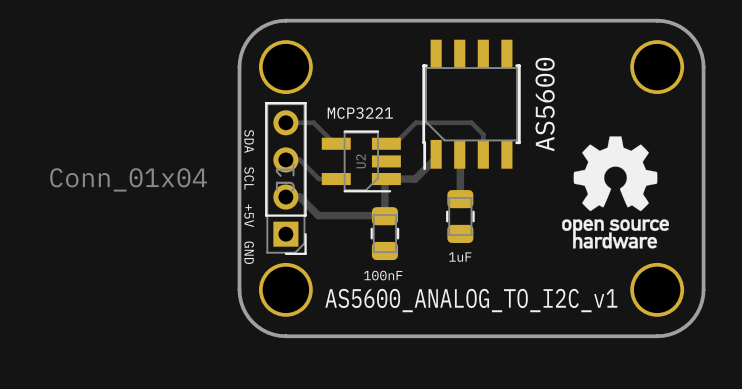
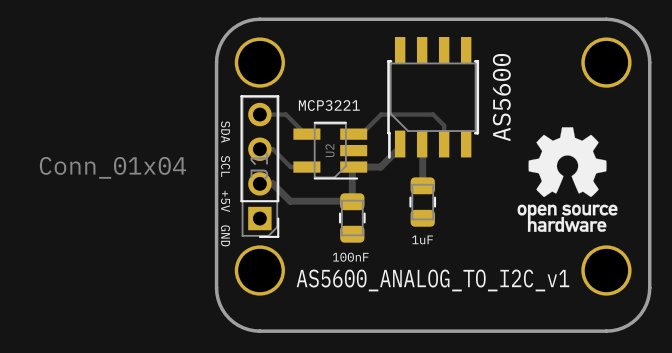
board edge: (239, 289) (243, 307) (253, 322) (268, 332) (285, 336) (663, 335) (680, 330) (693, 318) (702, 301) (703, 289) -> (216, 270) (218, 299) (225, 314) (243, 327) (259, 331) (612, 330) (632, 322) (643, 309) (649, 293) (649, 270)

